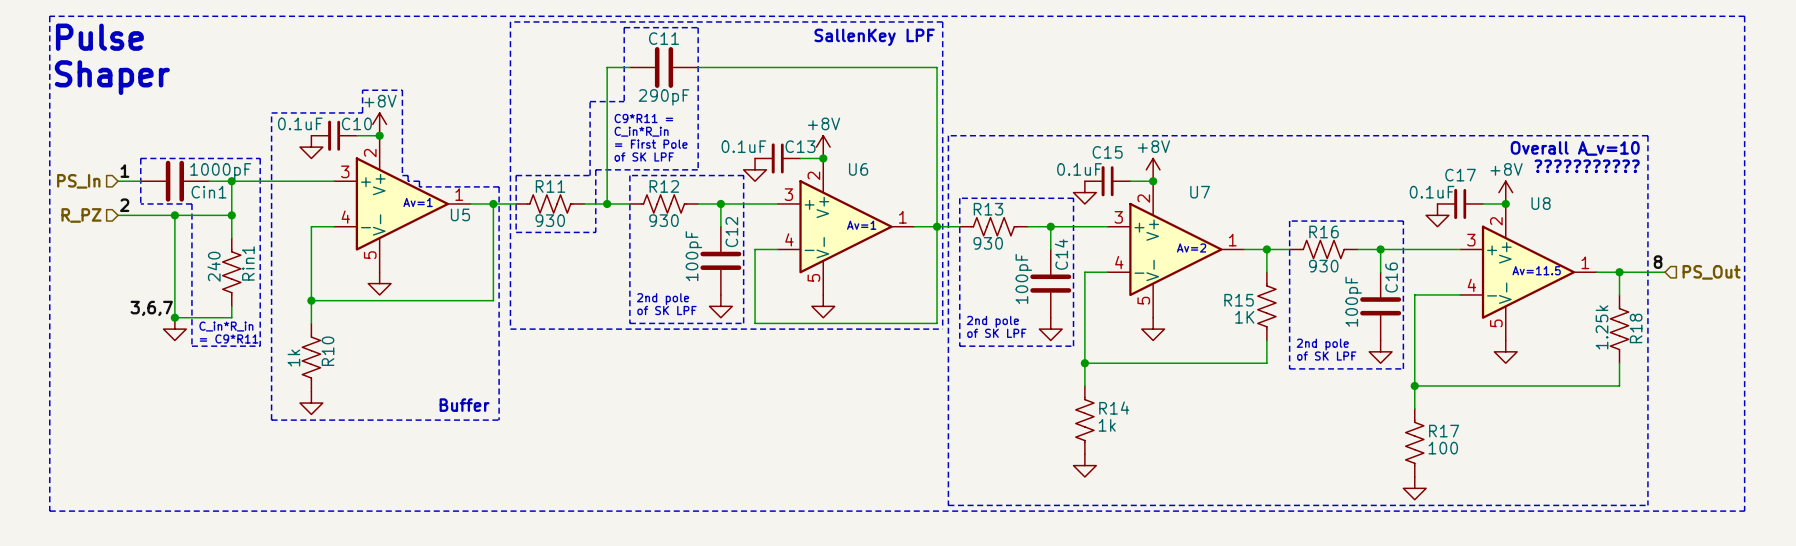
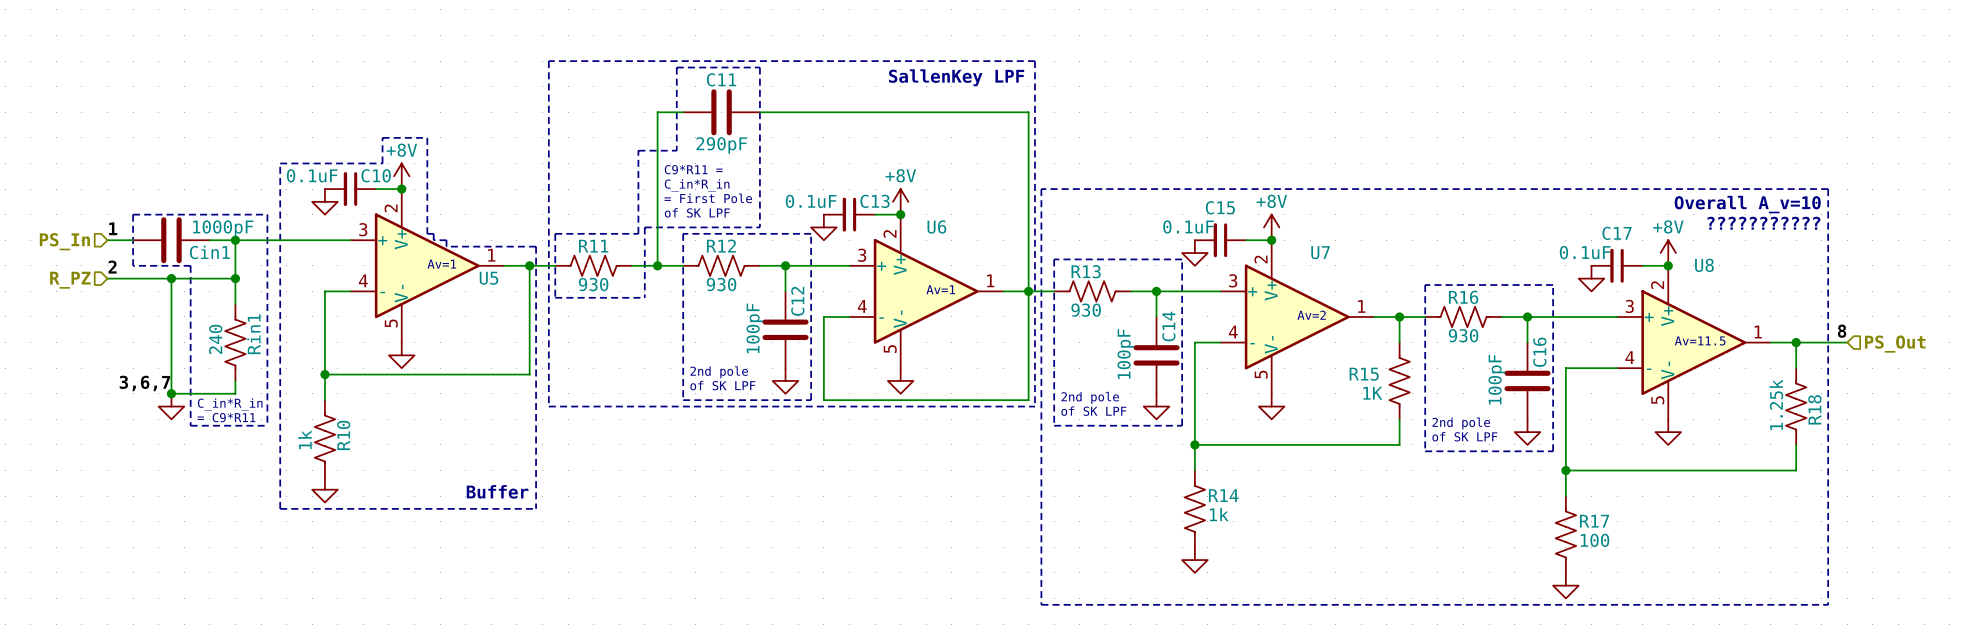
line: (49, 16) (1744, 16) (1744, 511) (49, 511) (49, 16) -> none
text: Pulse (99, 37) -> none
text: Shaper (112, 77) -> none

